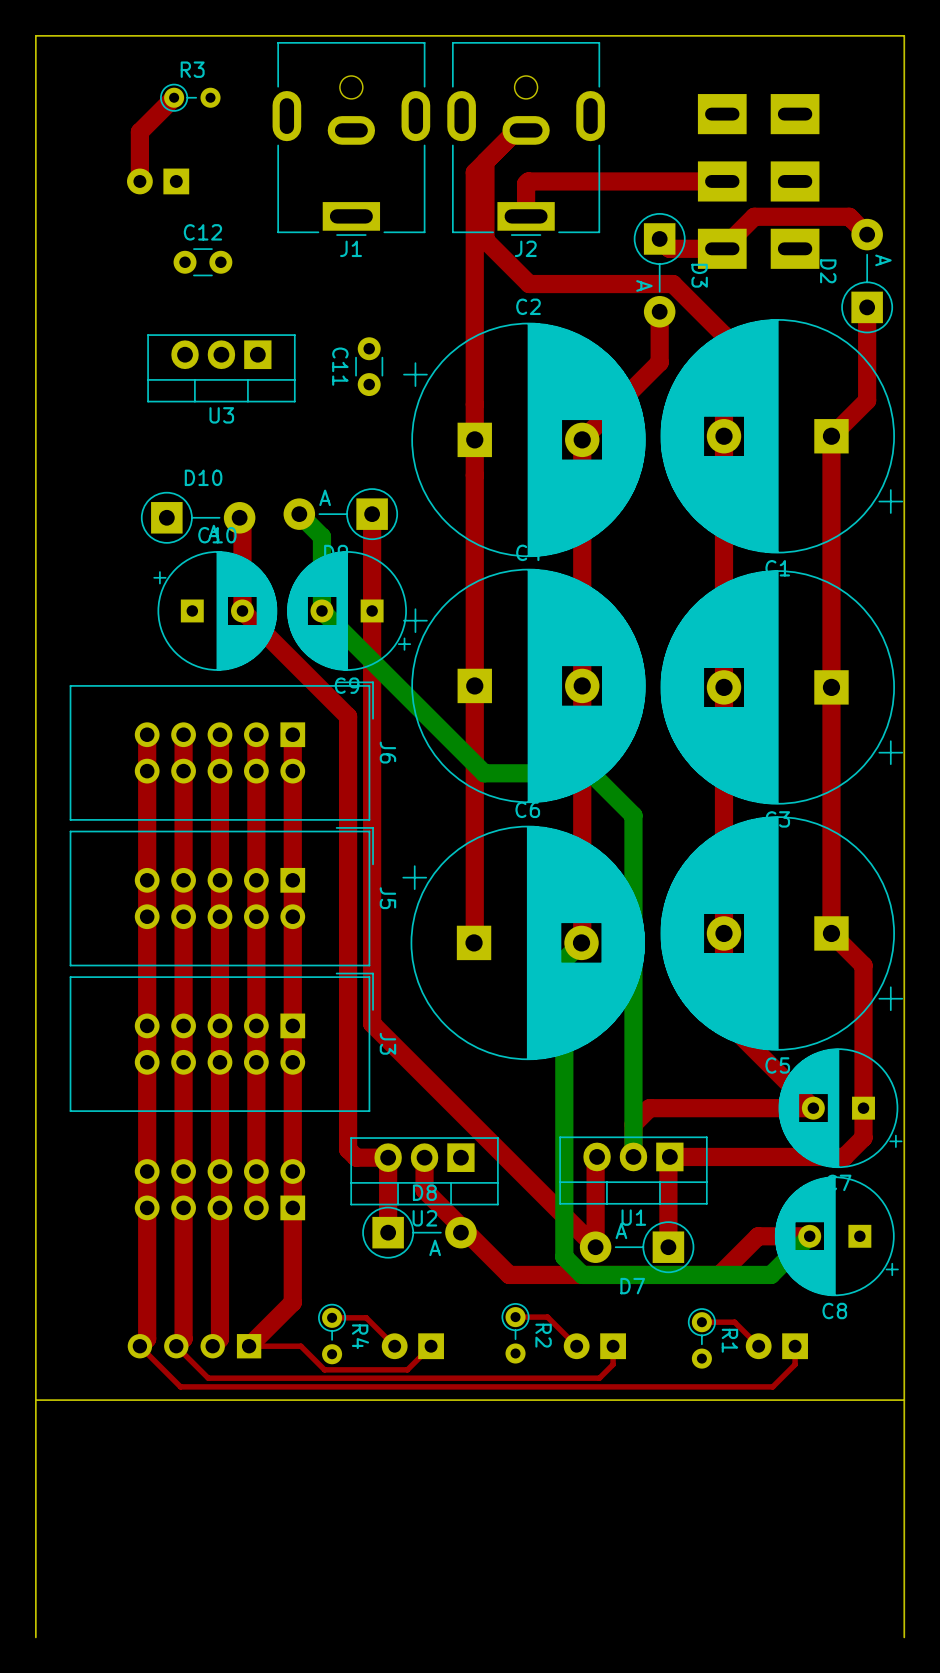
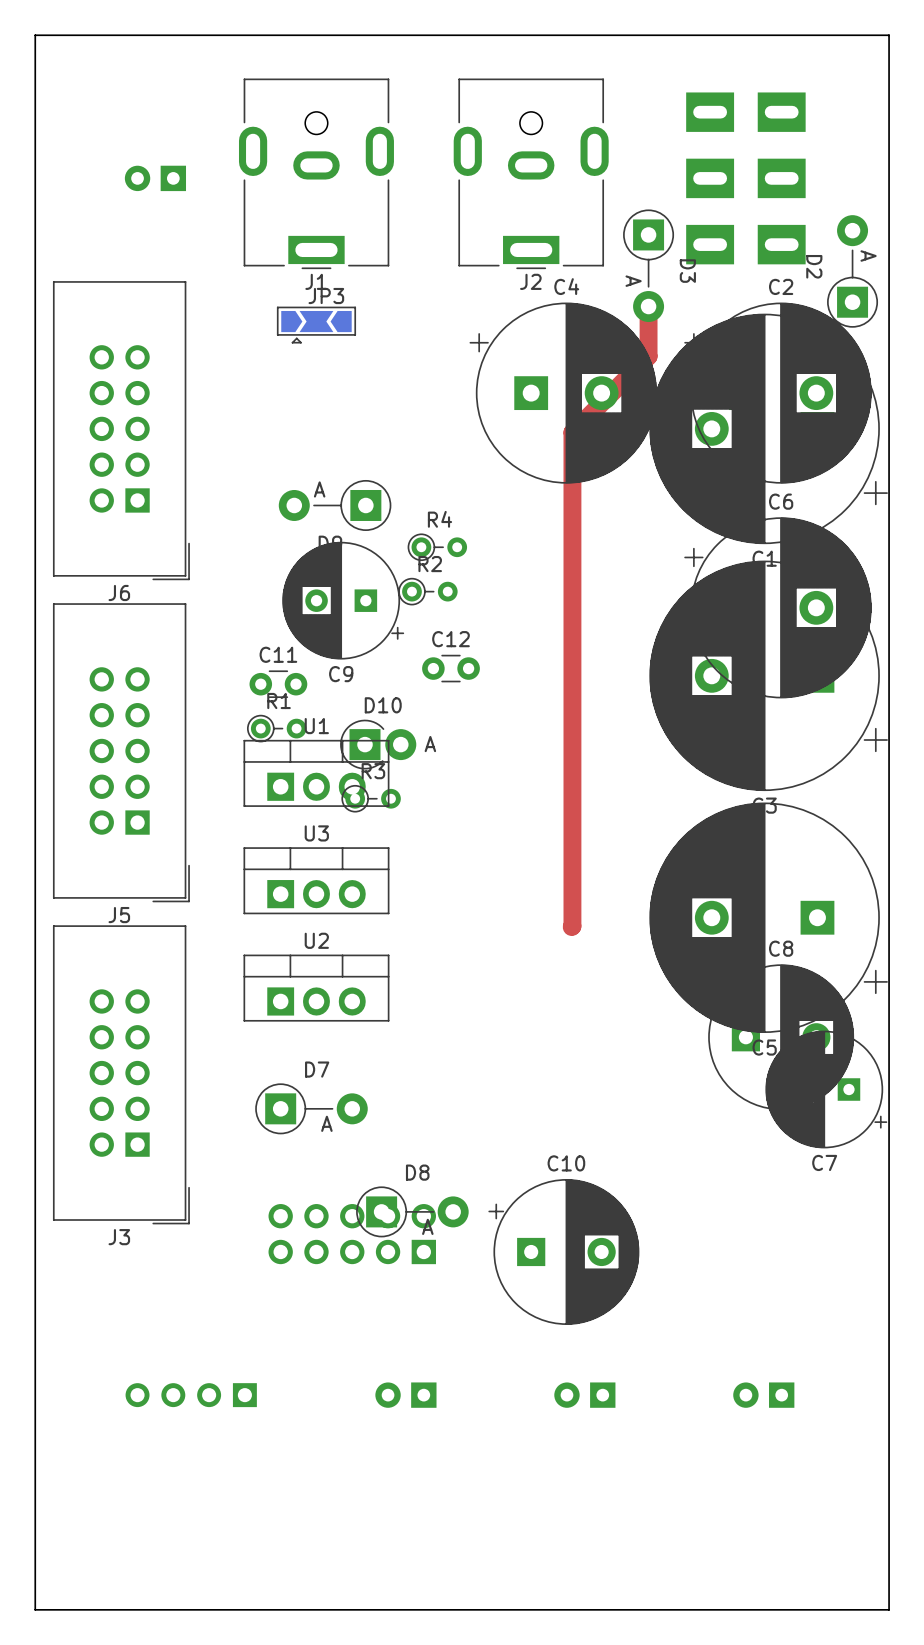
top track: (174, 97) (139, 131) (139, 181) -> none
R3 position: (190, 97) -> (371, 798)
top track: (526, 130) (516, 130) (474, 172) (474, 942) -> none
J1 position: (351, 138) -> (316, 173)
J2 position: (526, 138) -> (531, 173)
top track: (485, 161) (485, 240) (529, 284) (672, 284) (724, 335) (724, 1018) (813, 1108) (649, 1108) (633, 1124) (633, 1156) -> none
top track: (722, 181) (528, 181) (526, 183) (526, 216) -> none
top track: (867, 234) (849, 216) (754, 216) (722, 248) (669, 248) (659, 238) -> none
C12 position: (202, 262) -> (450, 668)
top track: (867, 307) (867, 400) (831, 436) (831, 933) (863, 965) (863, 1137) (844, 1156) (669, 1156) (668, 1247) -> none
C2 footprint: [403, 322, 646, 558] -> [684, 302, 872, 484]
JP3: none -> (316, 325)
C11 rotation: 0° (369, 366) -> 90° clockwise (278, 684)
C11 position: (369, 366) -> (278, 684)
U3 rotation: 0° (221, 368) -> 180° (316, 880)
U3 position: (221, 368) -> (316, 880)
D10 footprint: [140, 491, 256, 544] -> [340, 719, 417, 770]
bottom track: (299, 514) (321, 536) (321, 610) (484, 773) (591, 773) (633, 815) (633, 1156) -> none
top track: (372, 514) (372, 1023) (595, 1247) -> none
top track: (239, 517) (242, 520) (242, 610) (348, 716) (348, 1149) (356, 1157) (388, 1157) (388, 1232) -> none
C10 footprint: [153, 551, 278, 671] -> [488, 1179, 640, 1325]
C4 footprint: [403, 568, 646, 804] -> [469, 302, 658, 484]
top track: (147, 734) (147, 1338) (139, 1346) (180, 1386) (772, 1386) (795, 1364) (795, 1346) -> none
top track: (183, 734) (183, 1338) (176, 1346) (208, 1378) (599, 1378) (613, 1364) (613, 1346) -> none
top track: (219, 734) (219, 1338) (212, 1346) -> none
top track: (256, 734) (256, 1207) -> none
top track: (292, 734) (292, 1302) (249, 1346) (300, 1346) (324, 1369) (407, 1369) (431, 1346) -> none
J6 rotation: 0° (221, 751) -> 90° clockwise (121, 430)
J6 position: (221, 751) -> (121, 430)
C6 footprint: [402, 825, 646, 1061] -> [684, 517, 872, 699]
J5 rotation: 0° (221, 896) -> 90° clockwise (121, 752)
bottom track: (581, 942) (564, 960) (564, 1256) (582, 1274) (771, 1274) (809, 1236) -> none
J3 rotation: 0° (221, 1042) -> 90° clockwise (121, 1074)
top track: (597, 1156) (595, 1247) -> none
top track: (424, 1157) (424, 1190) (509, 1274) (719, 1274) (758, 1236) (809, 1236) -> none
U1 rotation: 0° (633, 1170) -> 180° (316, 773)
U1 position: (633, 1170) -> (316, 773)
U2 rotation: 0° (424, 1171) -> 180° (316, 988)
U2 position: (424, 1171) -> (316, 988)
C8 footprint: [774, 1176, 899, 1297] -> [703, 964, 855, 1111]
part position: (219, 1189) -> (352, 1234)
D7 rotation: 0° (637, 1247) -> 180° (311, 1108)
D7 position: (637, 1247) -> (311, 1108)
C8 name position: C8 (834, 1310) -> C8 (781, 948)
top track: (332, 1317) (366, 1317) (394, 1346) -> none
top track: (515, 1317) (547, 1317) (576, 1346) -> none
top track: (701, 1322) (734, 1322) (758, 1346) -> none
R2 rotation: 0° (515, 1333) -> 90° counterclockwise (427, 591)
R2 position: (515, 1333) -> (427, 591)
R4 rotation: 0° (332, 1334) -> 90° counterclockwise (437, 547)
R4 position: (332, 1334) -> (437, 547)
R1 rotation: 0° (701, 1338) -> 90° counterclockwise (276, 728)
R1 position: (701, 1338) -> (276, 728)
part position: (194, 1346) -> (191, 1395)
part position: (412, 1346) -> (405, 1395)
part position: (594, 1346) -> (584, 1395)
part position: (776, 1346) -> (763, 1395)
board edge: (904, 1400) (35, 1400) -> (889, 1609) (35, 1609)

